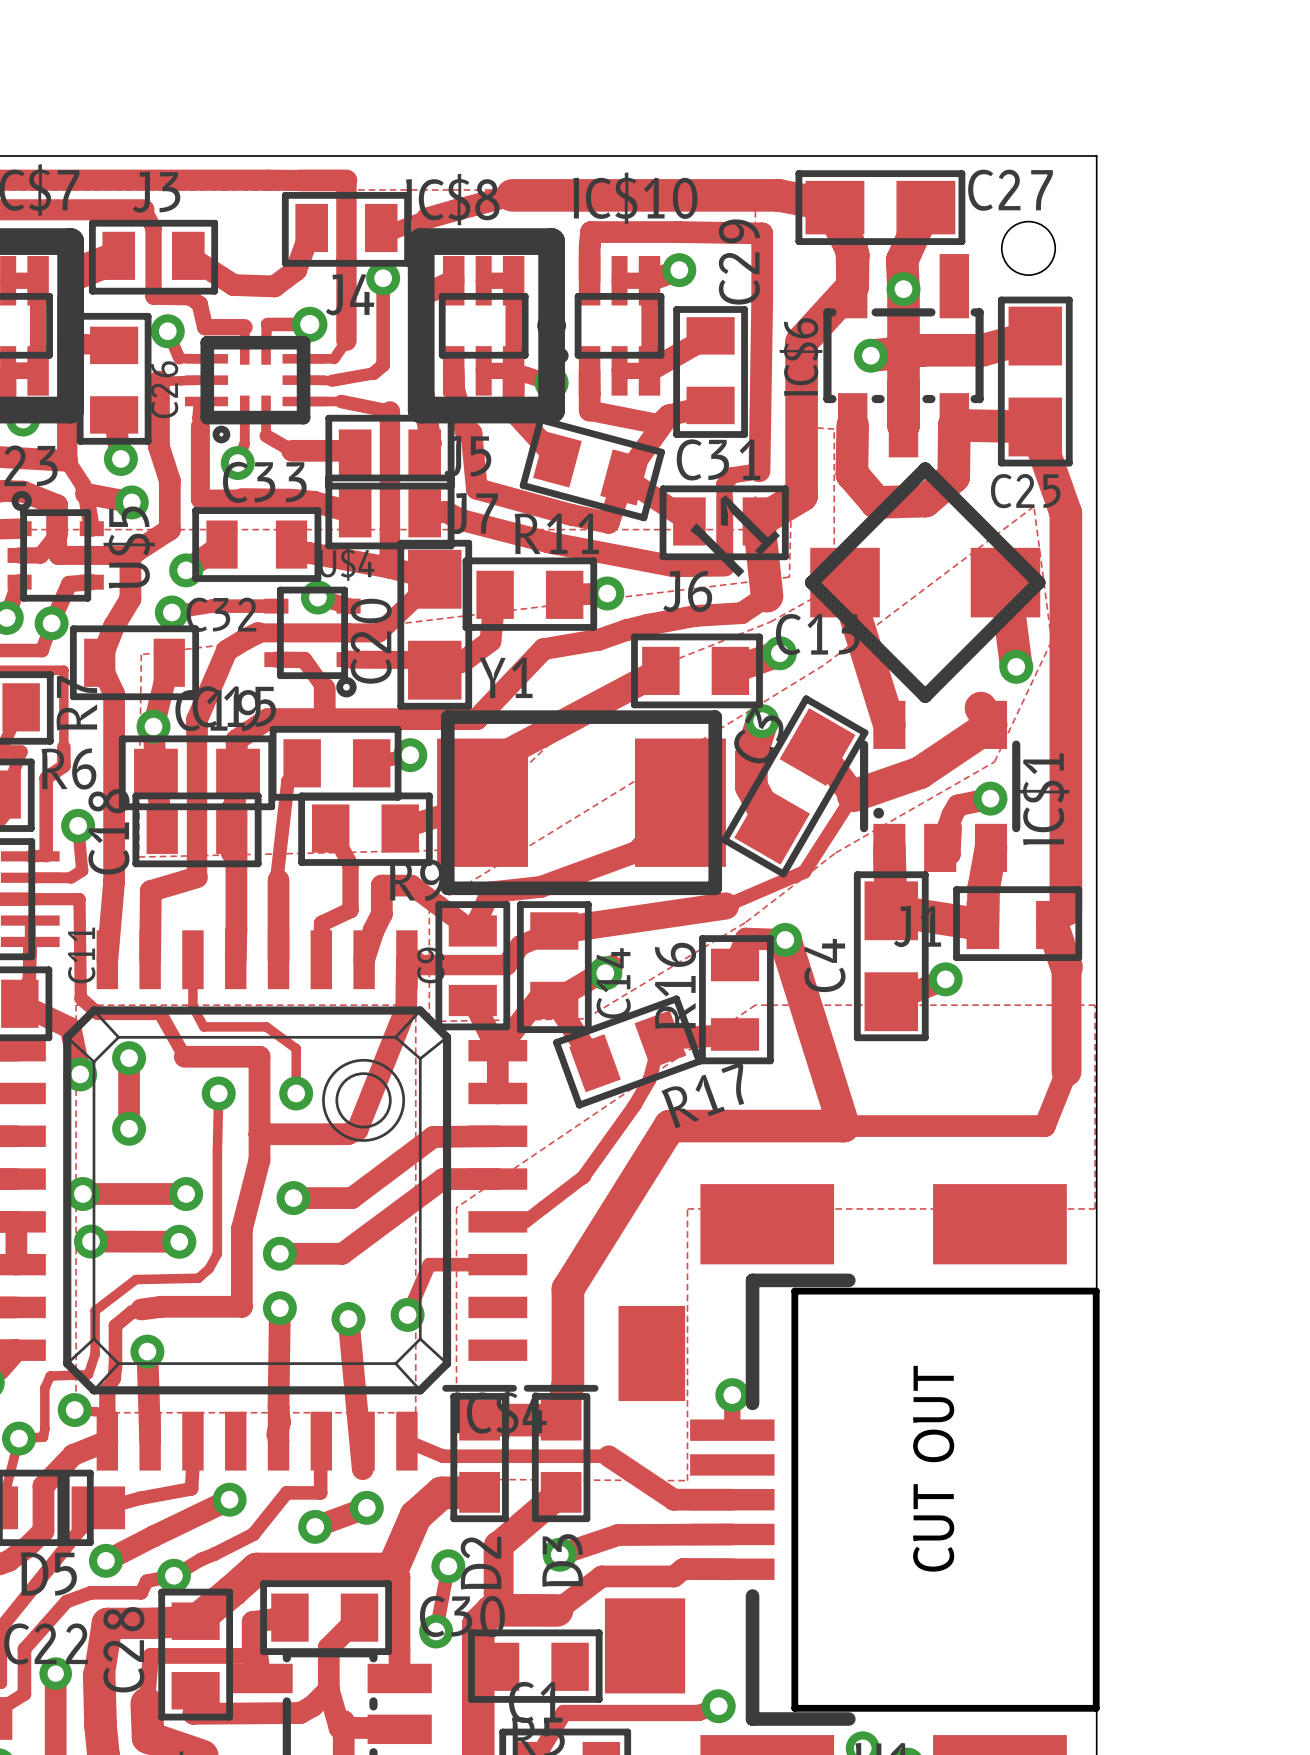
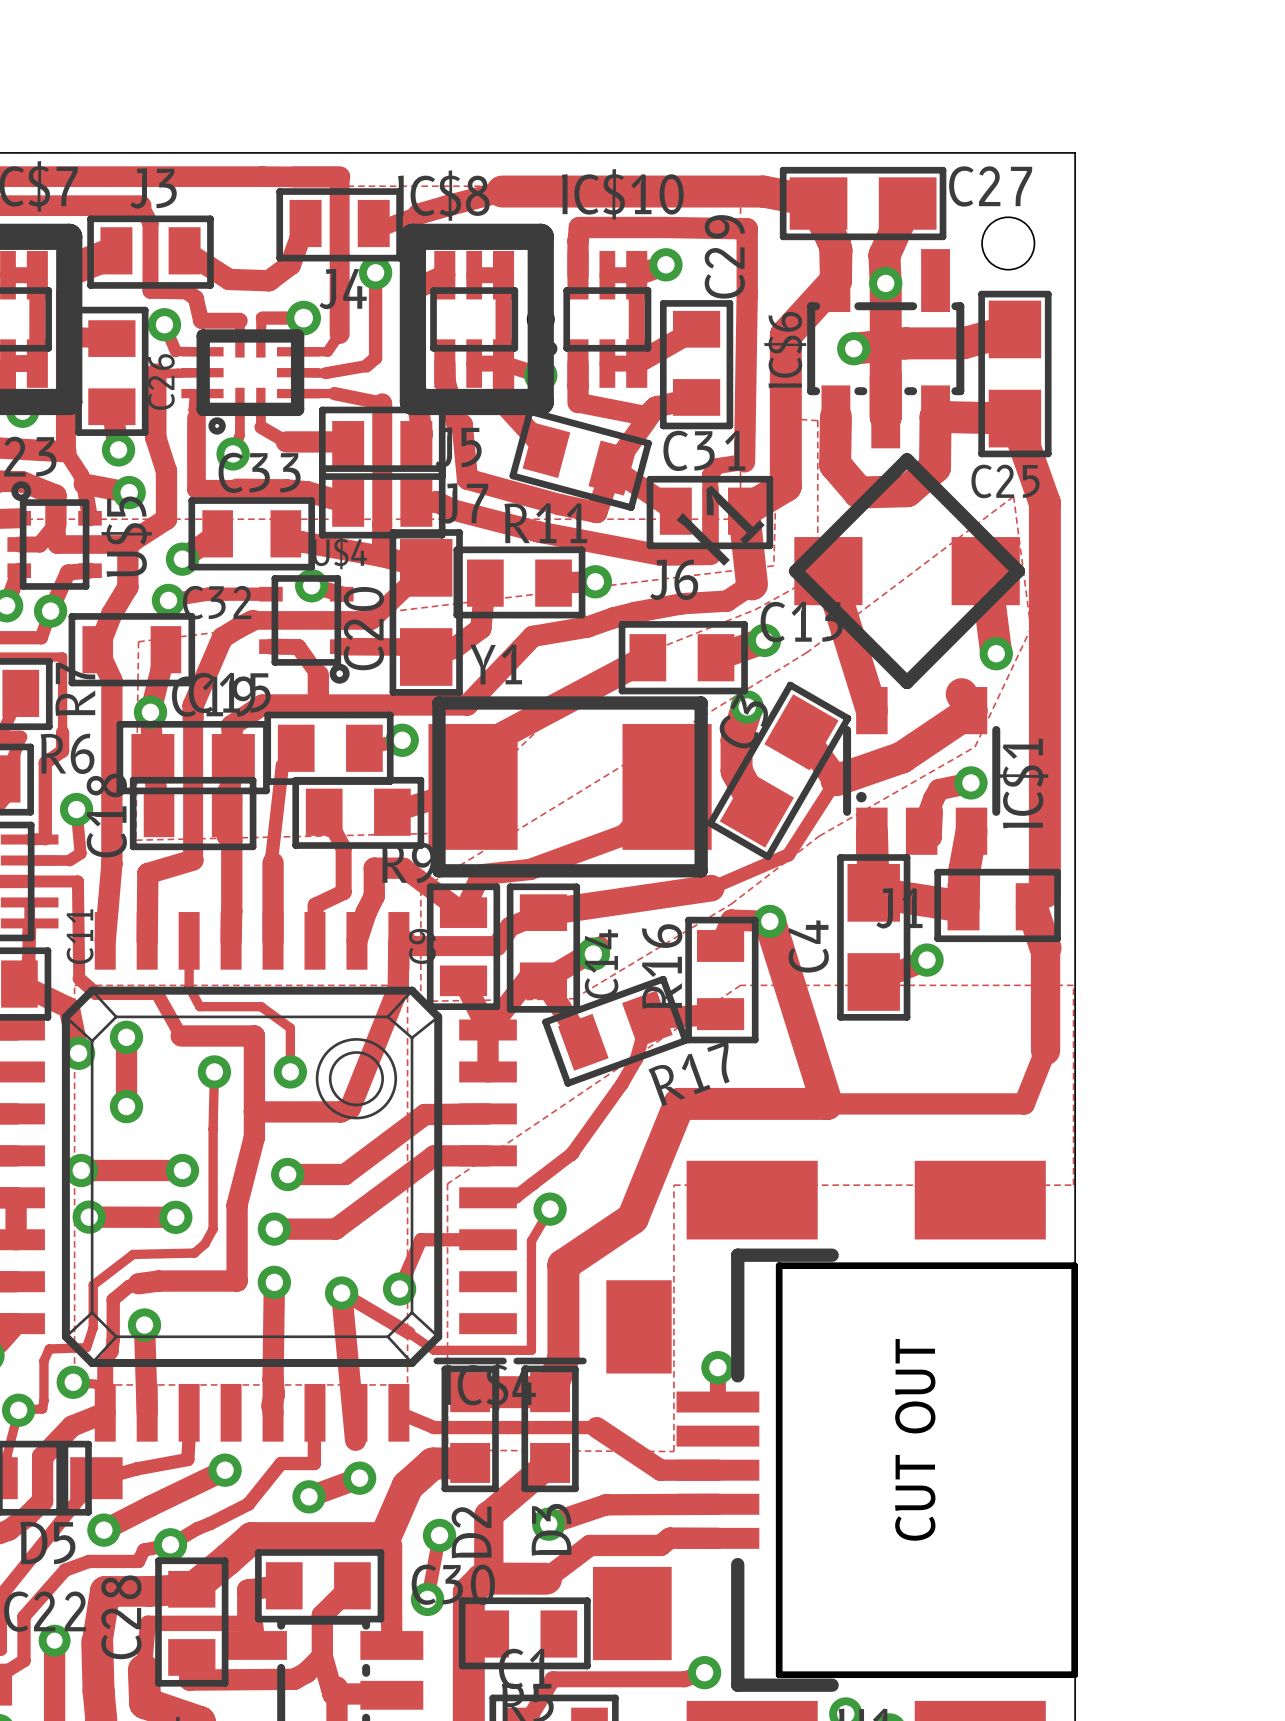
track: (692, 1126) (669, 1126) (567, 1289) (567, 1384) (561, 1420) -> (679, 1103) (632, 1218) (563, 1265) (563, 1358) (550, 1392)
track: none -> (550, 1209) (531, 1241) (531, 1350) (434, 1350) (341, 1293)
via: none -> (550, 1209)

